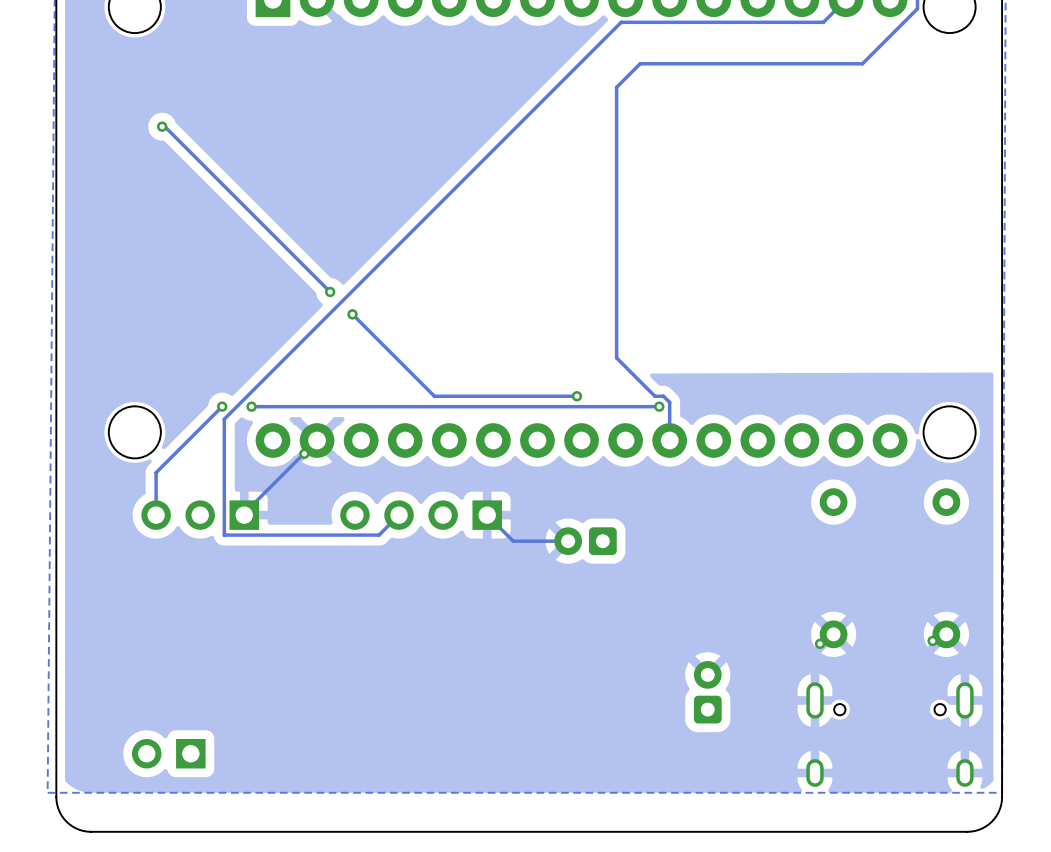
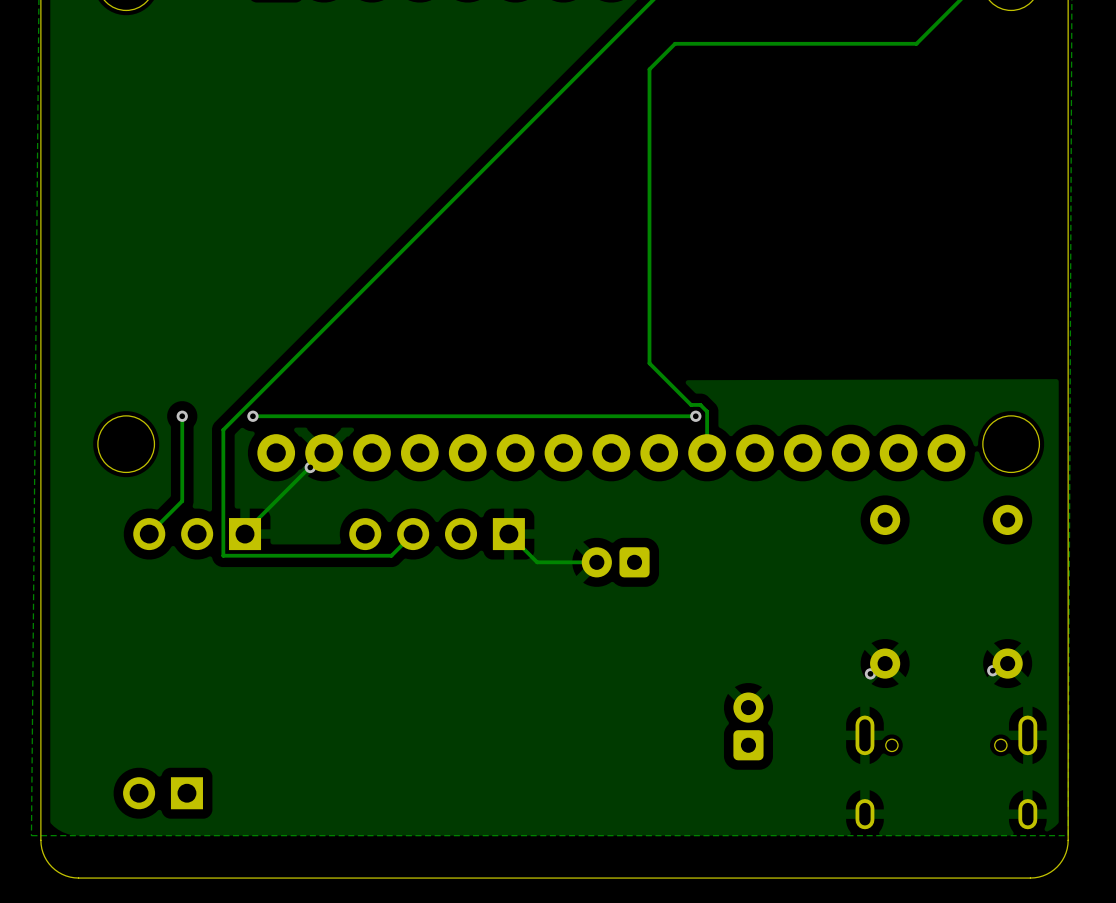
track: (162, 126) (164, 126) (330, 291) -> none
via: (162, 126) -> none
via: (330, 291) -> none
track: (352, 314) (434, 396) (576, 396) -> none
via: (352, 314) -> none
via: (576, 396) -> none
track: (222, 406) (156, 472) (156, 515) -> (182, 416) (182, 501) (149, 534)
via position: (222, 406) -> (182, 416)

